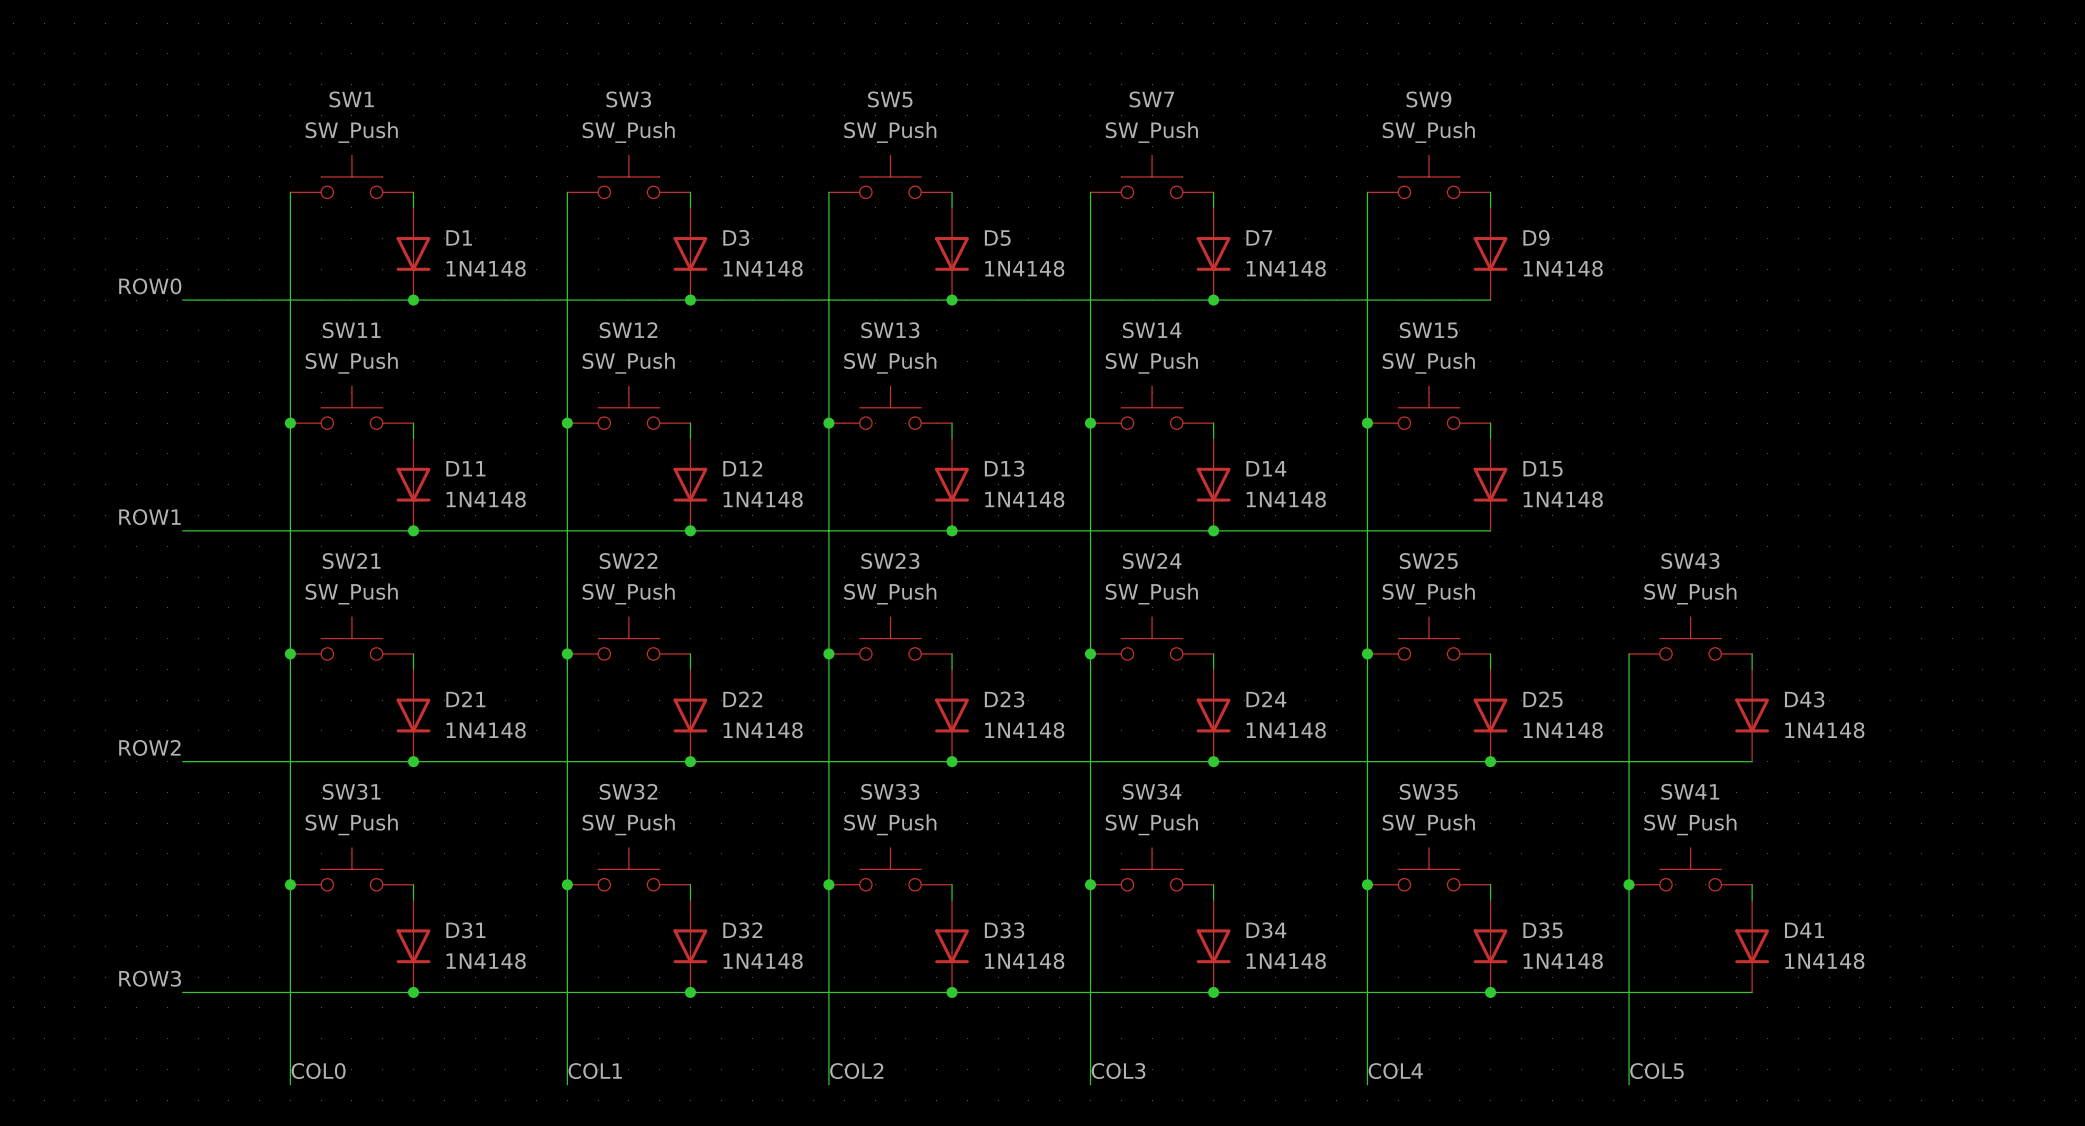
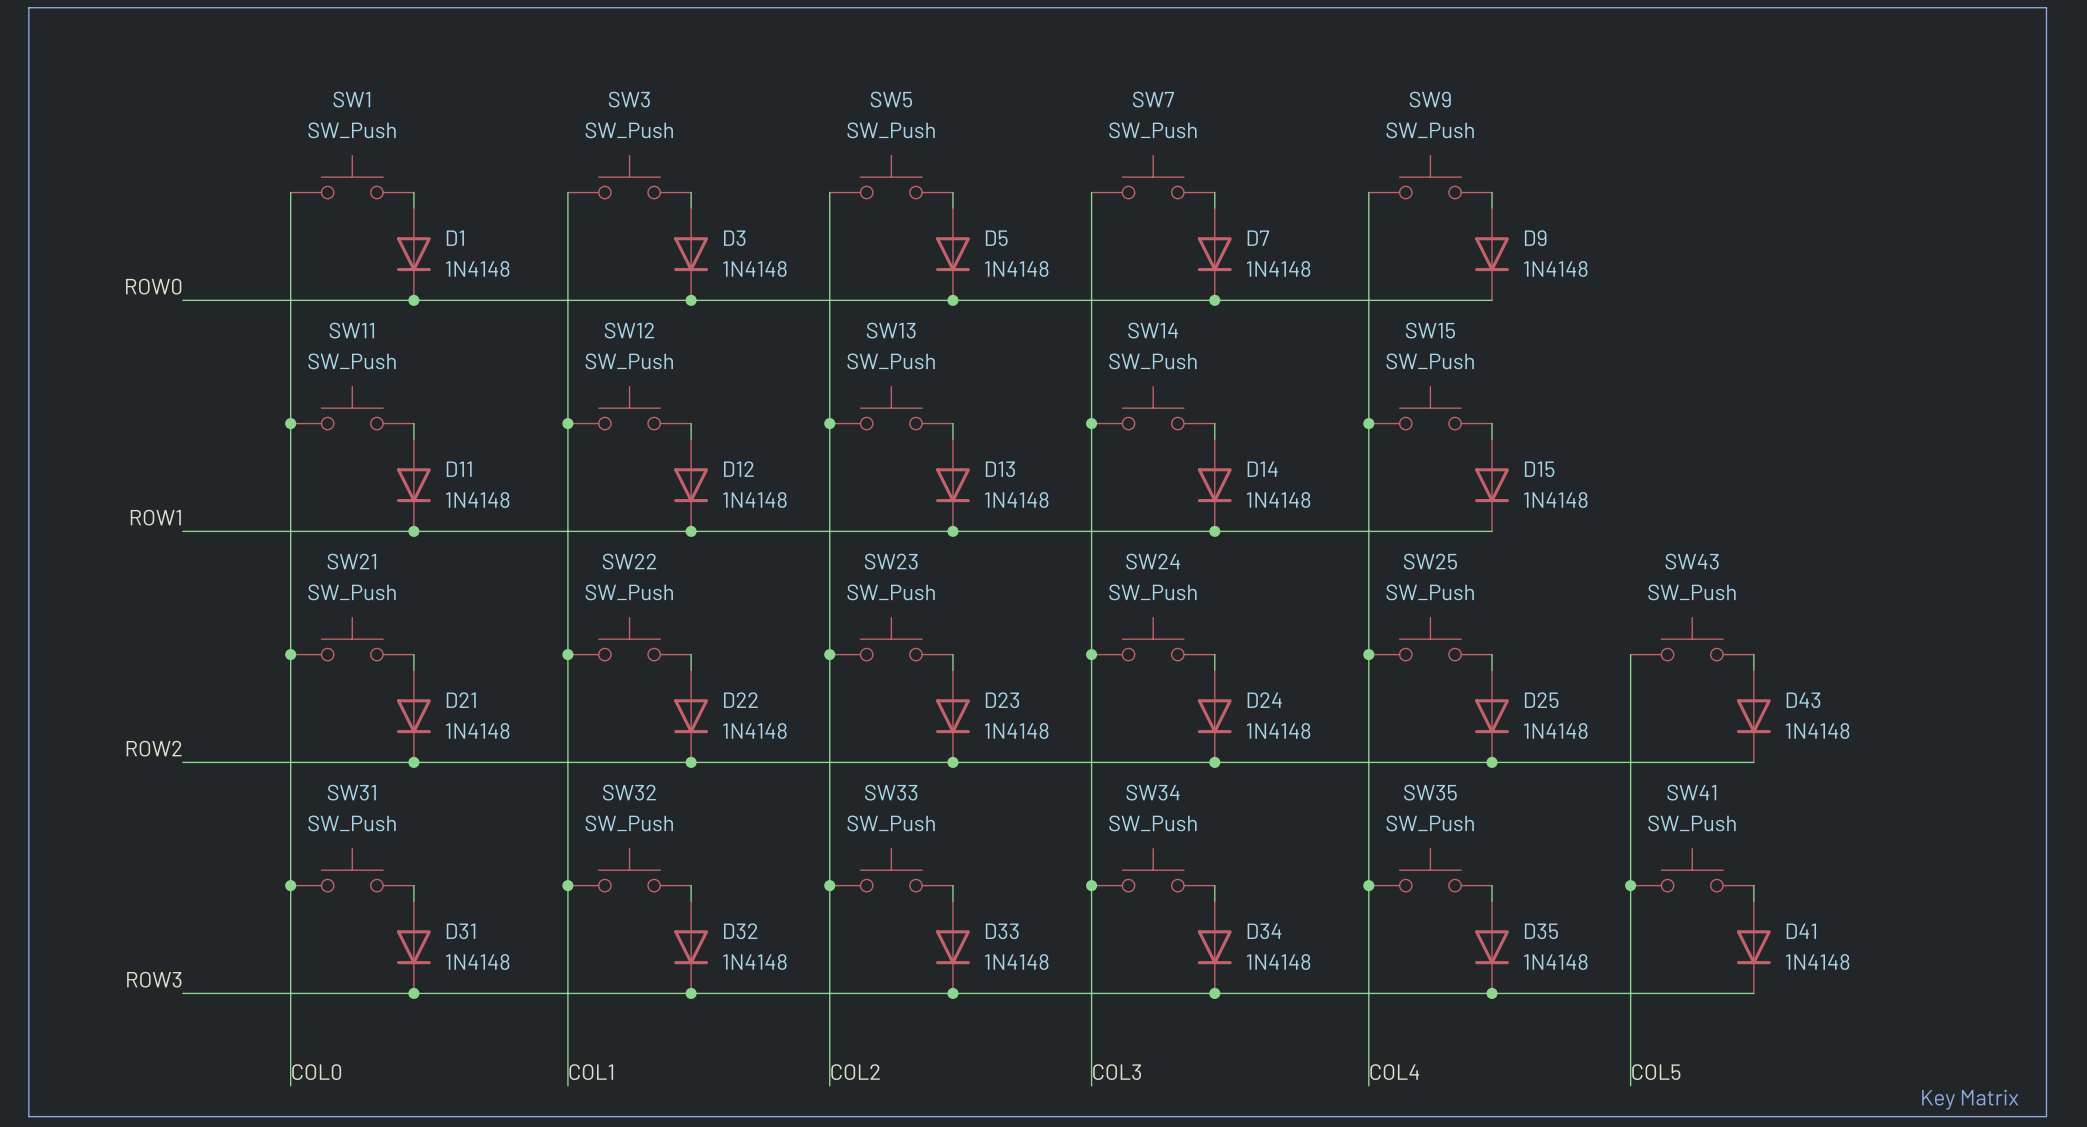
line: none -> (28, 7) (2046, 7) (2046, 1116) (28, 1116) (28, 7)
text: none -> Key Matrix (1970, 1099)

